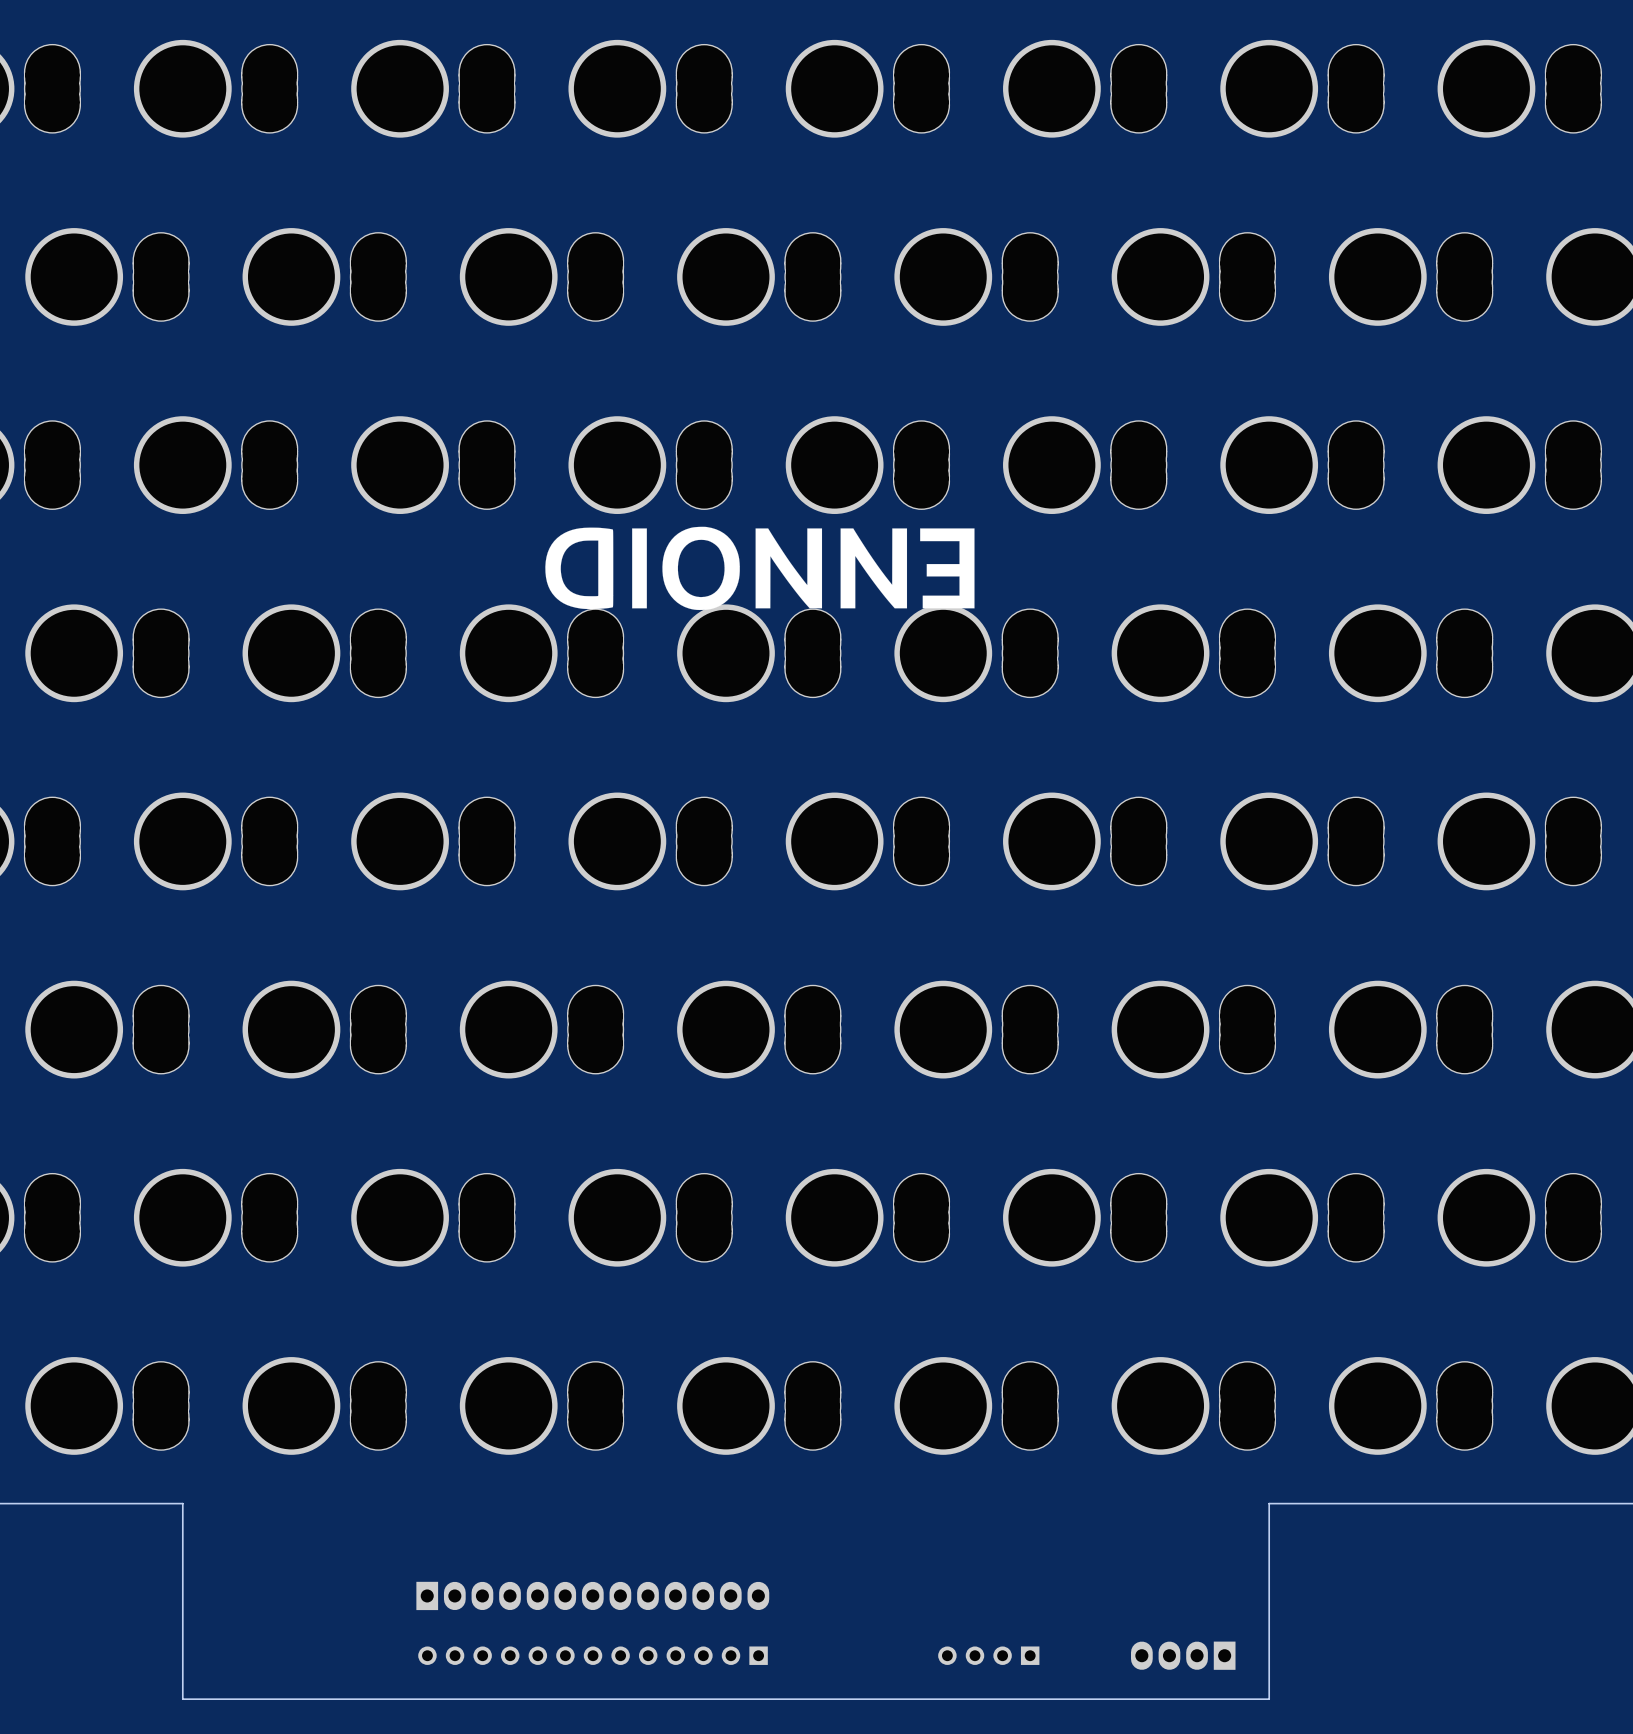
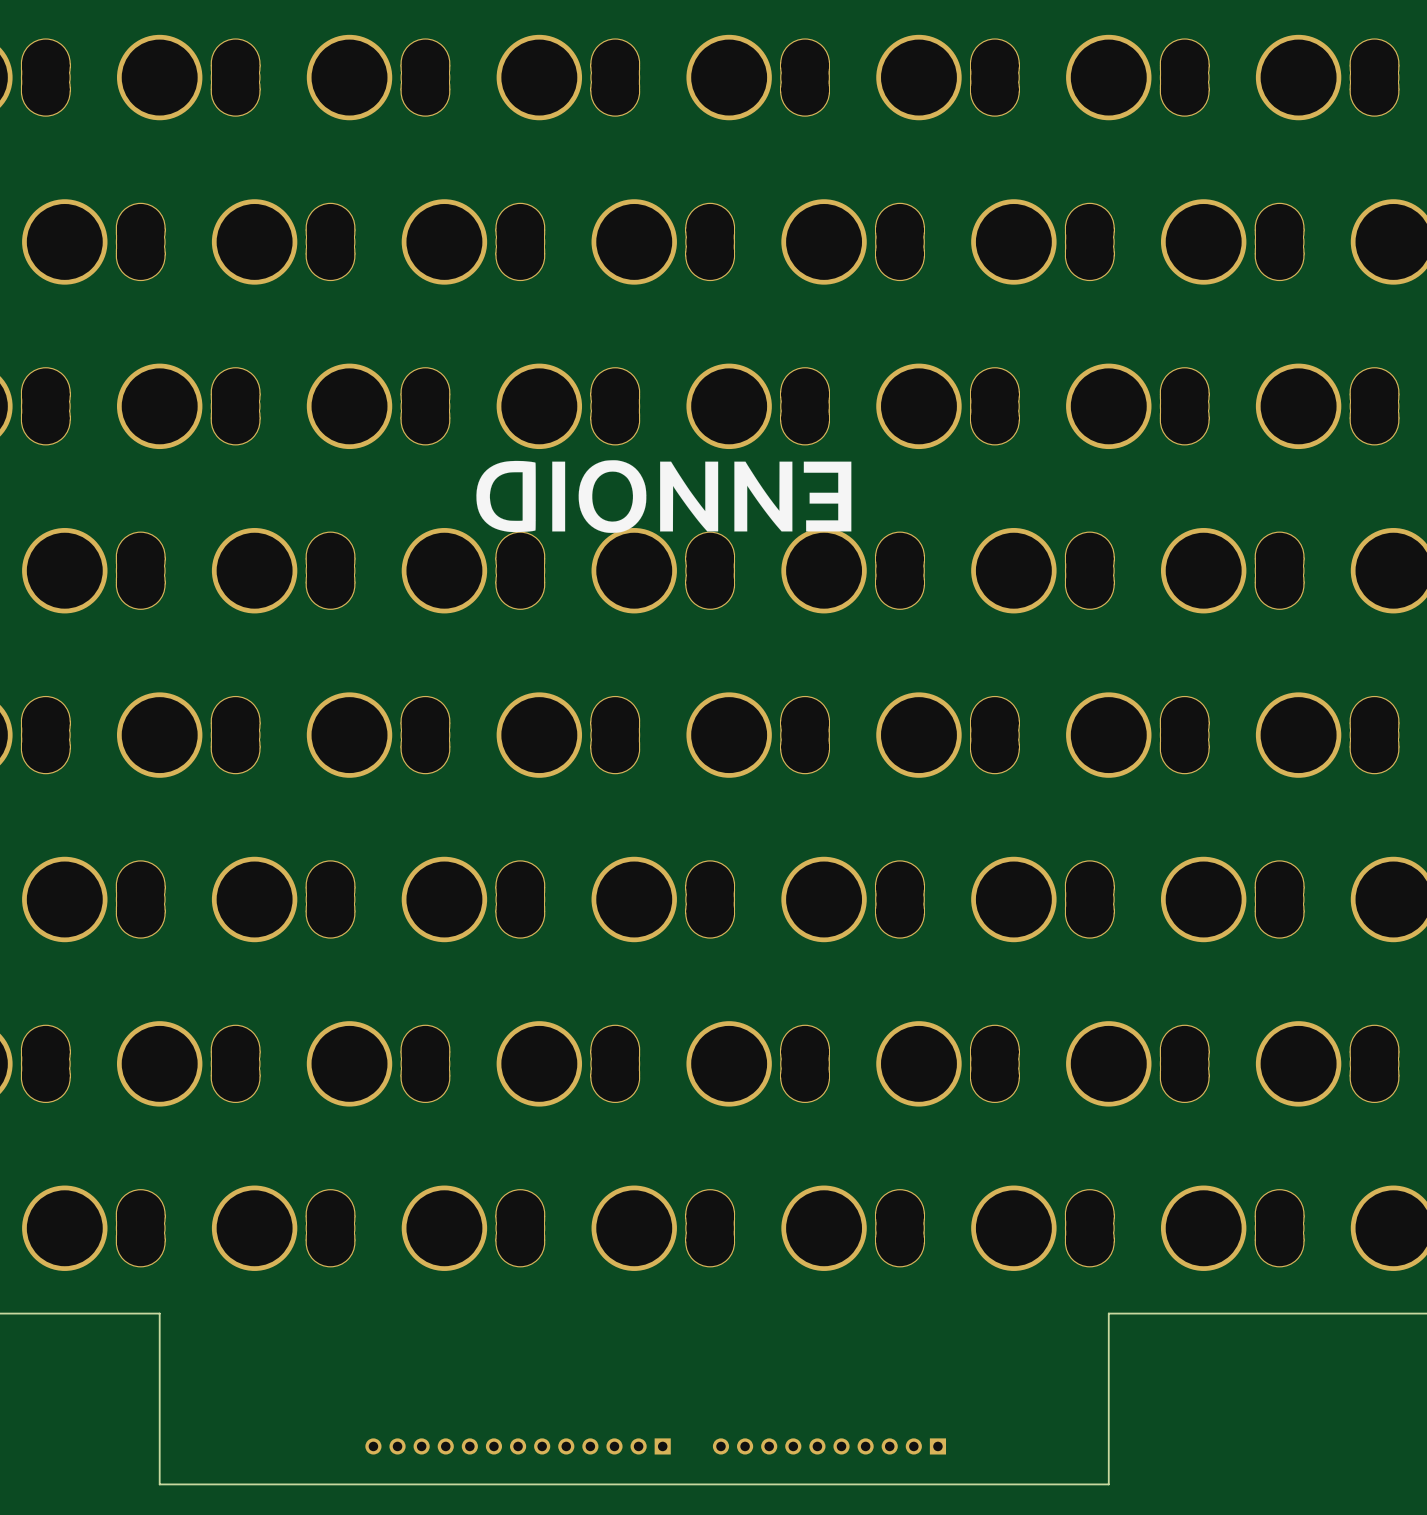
part: (592, 1595) -> none
part: none -> (829, 1446)
part: (988, 1655) -> none
part: (1183, 1655) -> none

